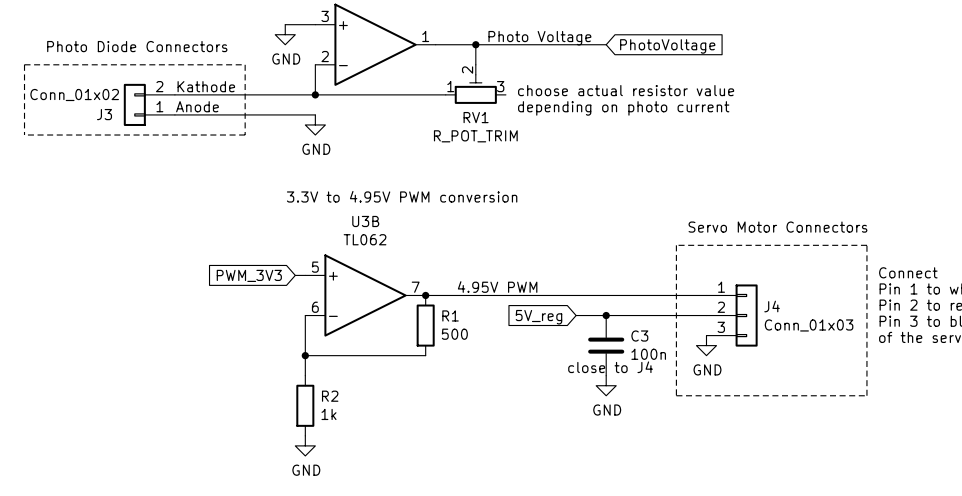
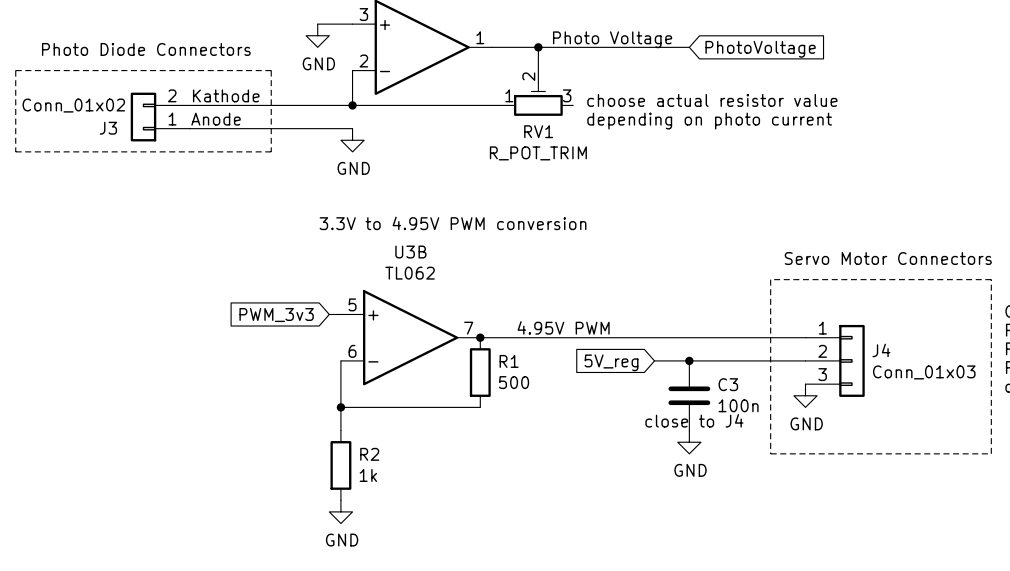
global label: PWM_3V3 (249, 275) -> PWM_3v3 (276, 315)

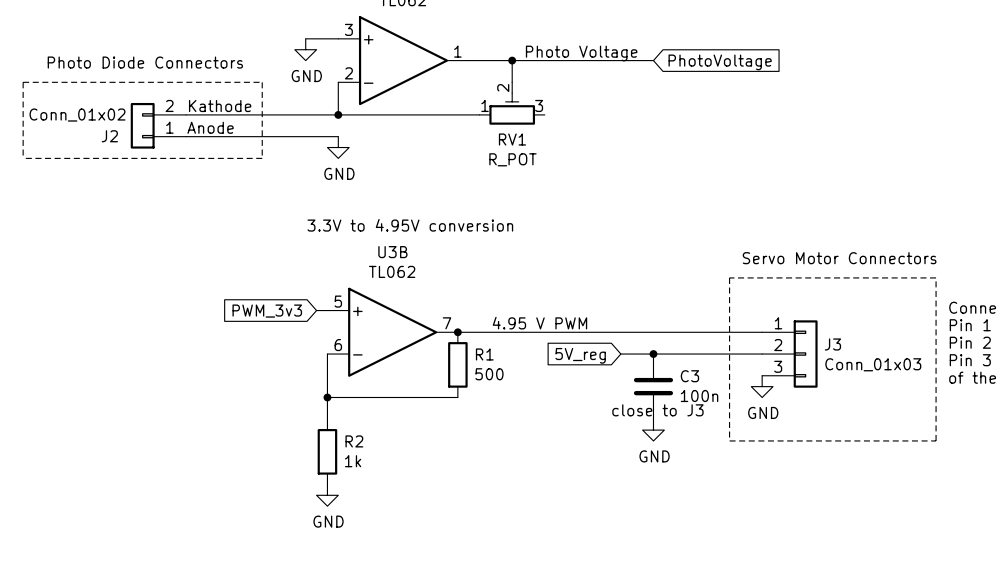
text: choose actual resistor value (712, 100) -> none
text: depending on photo current (709, 121) -> none
J3 name: J3 (108, 128) -> J2 (109, 136)
RV1 value: R_POT_TRIM (538, 153) -> R_POT (512, 159)
text: 3.3V to 4.95V PWM conversion (453, 223) -> 3.3V to 4.95V conversion (410, 225)
text: 4.95V PWM (563, 327) -> 4.95 V PWM (539, 323)
J4 name: J4 (881, 350) -> J3 (832, 344)
text: close to J4 (694, 420) -> close to J3 (657, 410)

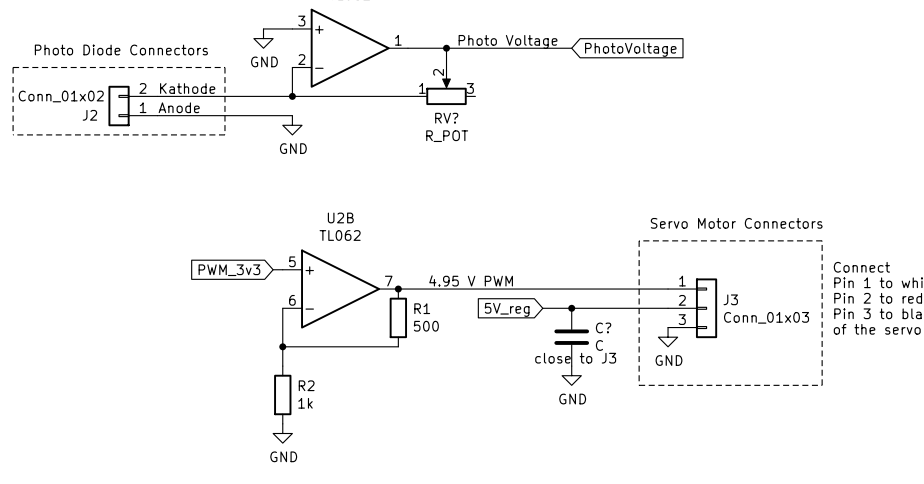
RV1: R_POT (512, 103) -> none
RV?: none -> R_POT (446, 86)
text: 3.3V to 4.95V conversion (410, 225) -> none
U3B name: U3B (392, 252) -> U2B (340, 217)
C3 name: C3 (689, 376) -> C? (603, 327)
C3 value: 100n (699, 396) -> C (599, 345)

